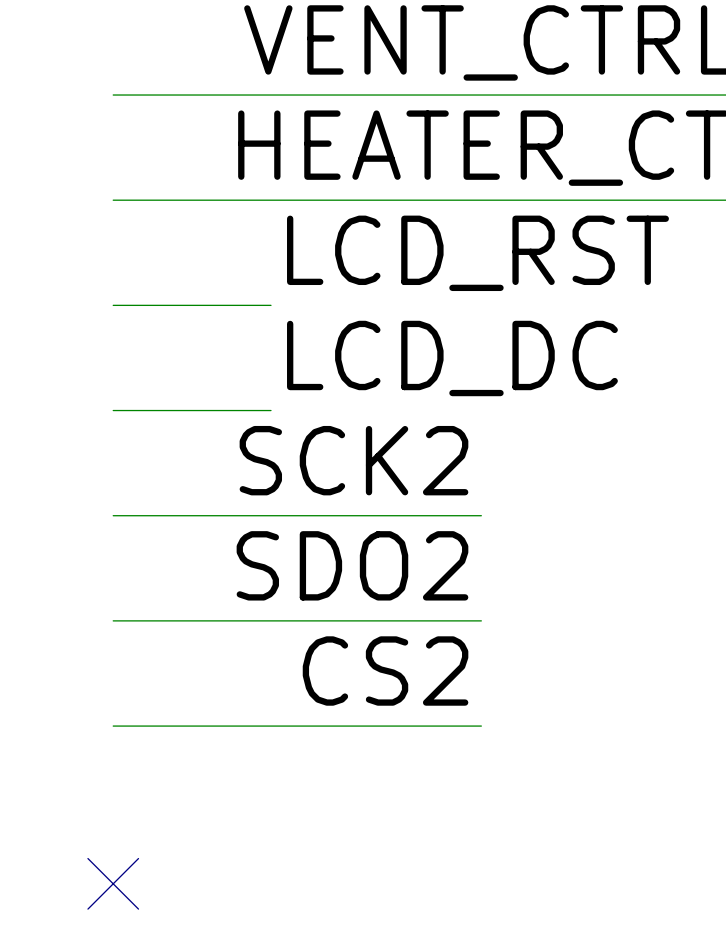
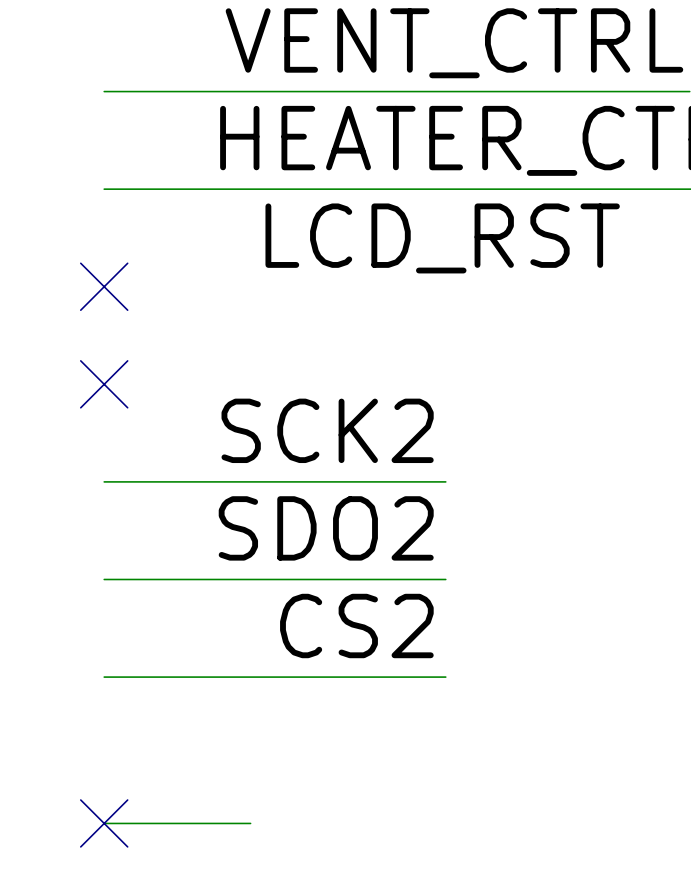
wire: (113, 305) (270, 305) -> none
no-connect mark: none -> (104, 286)
label: LCD_DC (452, 358) -> none
wire: (113, 410) (270, 410) -> (104, 823) (250, 823)
no-connect mark: none -> (104, 384)

